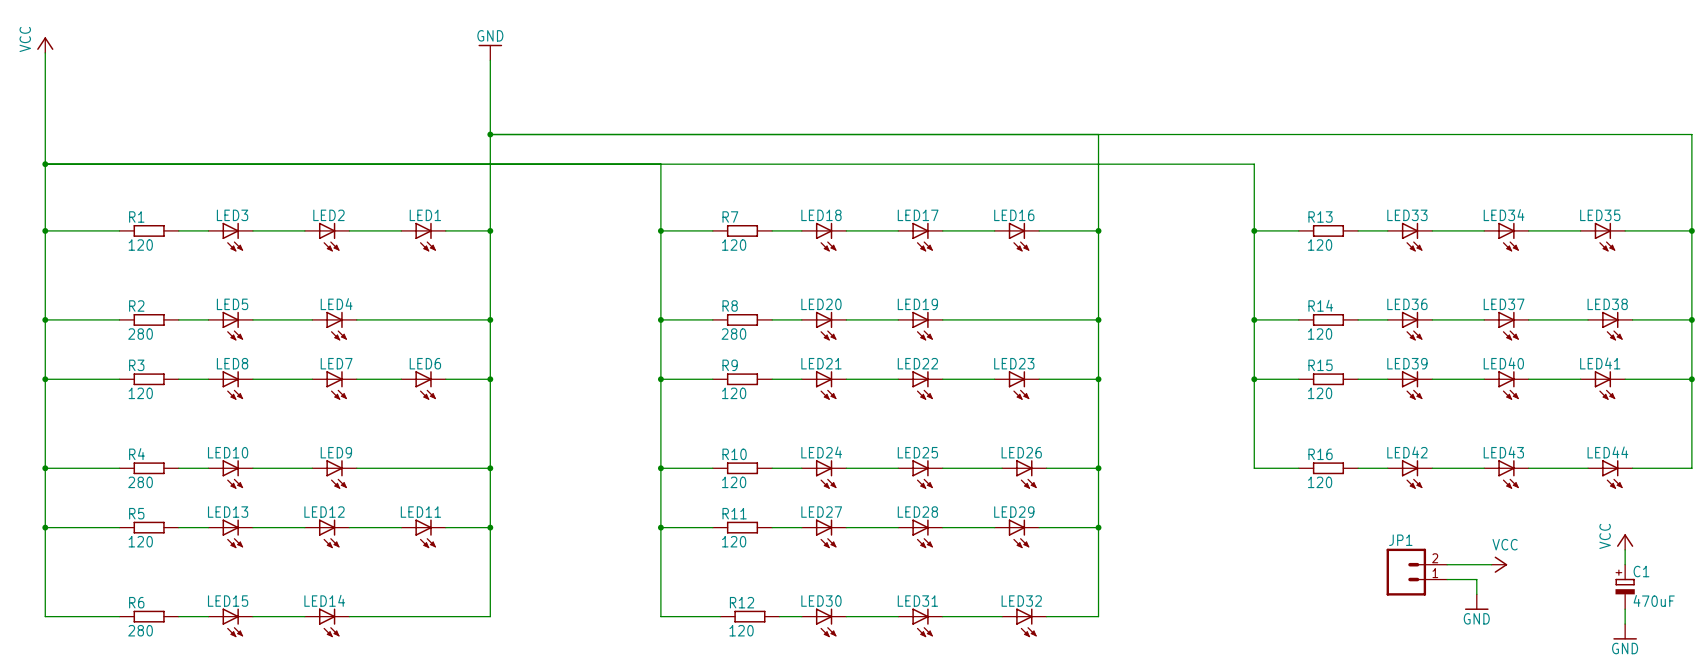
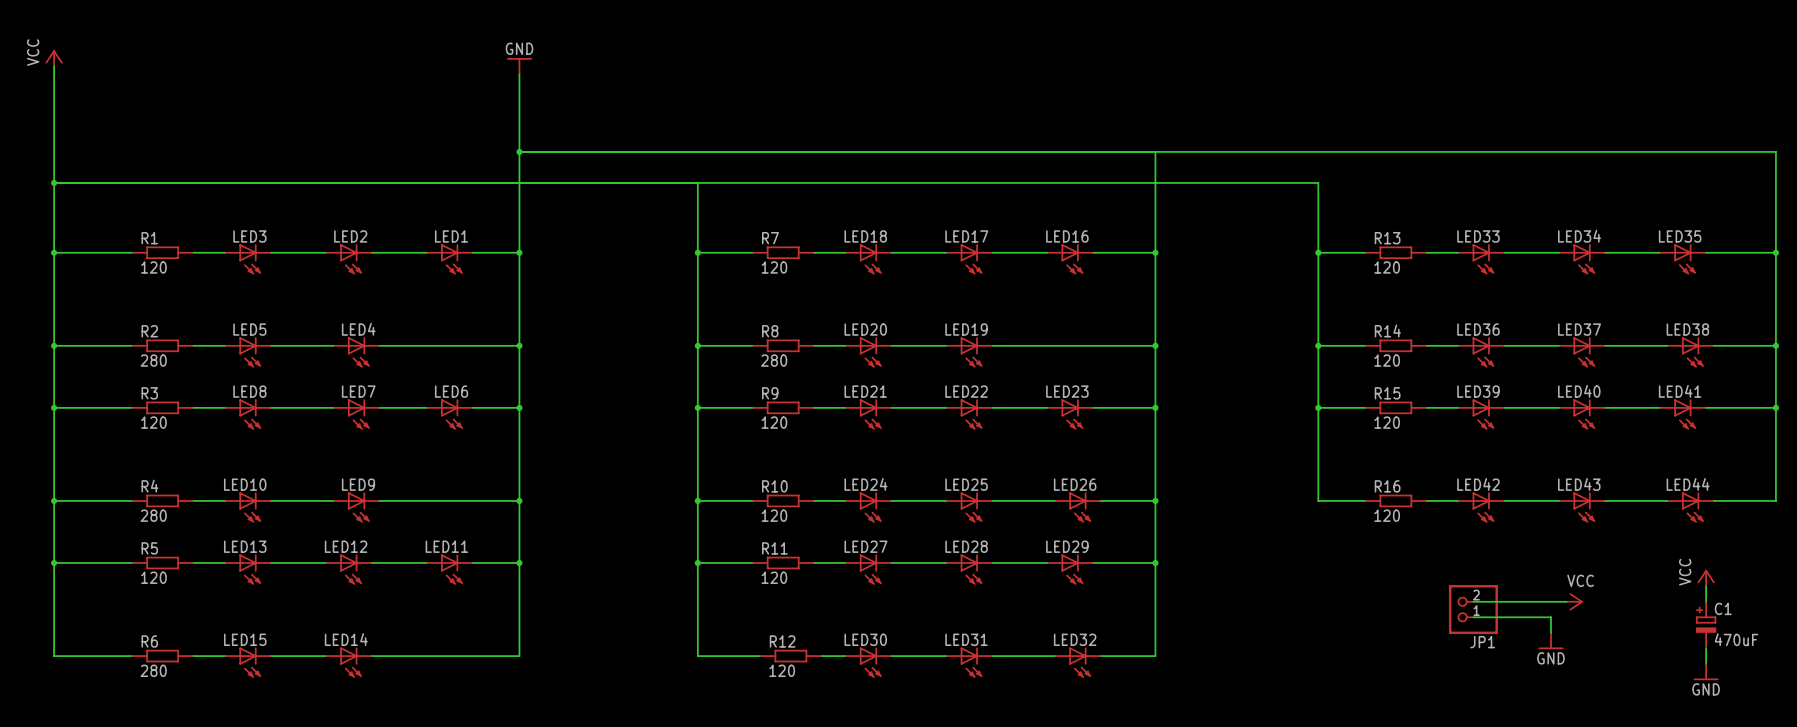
JP1 name position: JP1 (1400, 540) -> JP1 (1482, 642)
JP1 symbol: [1386, 548, 1448, 596] -> [1448, 585, 1498, 635]

